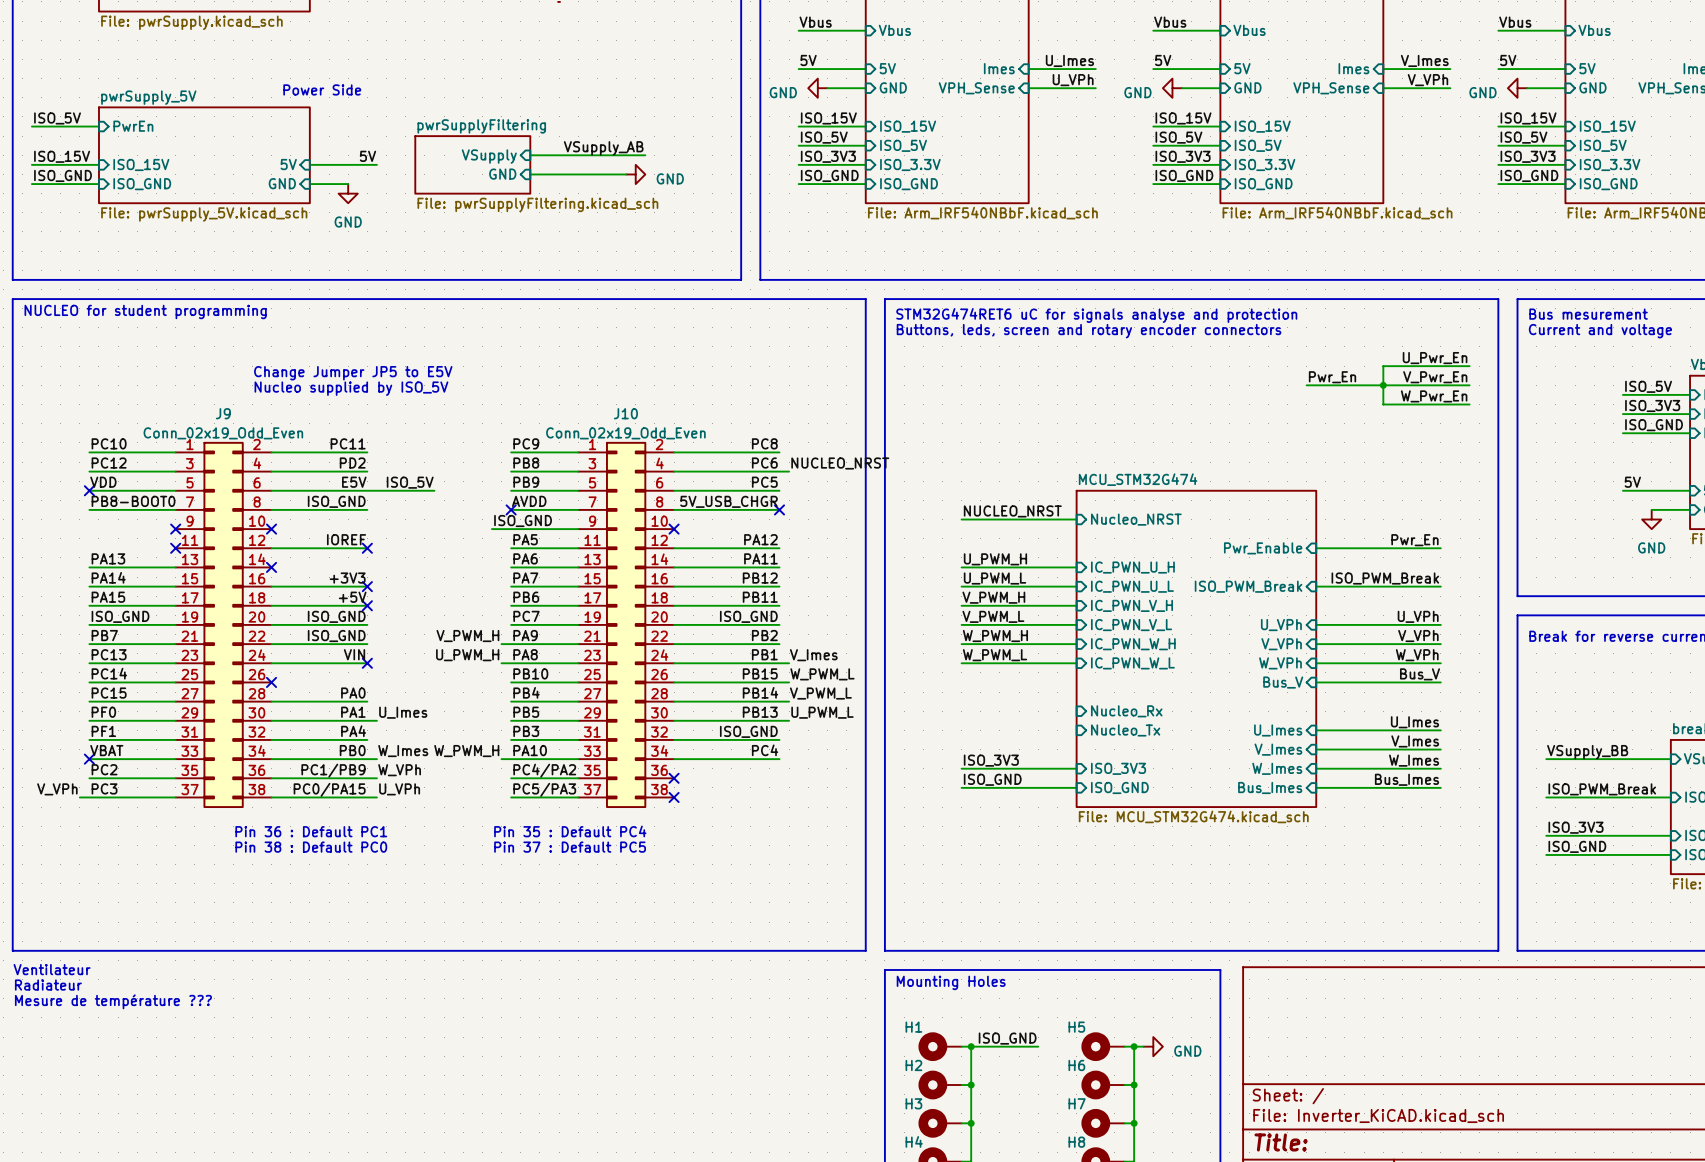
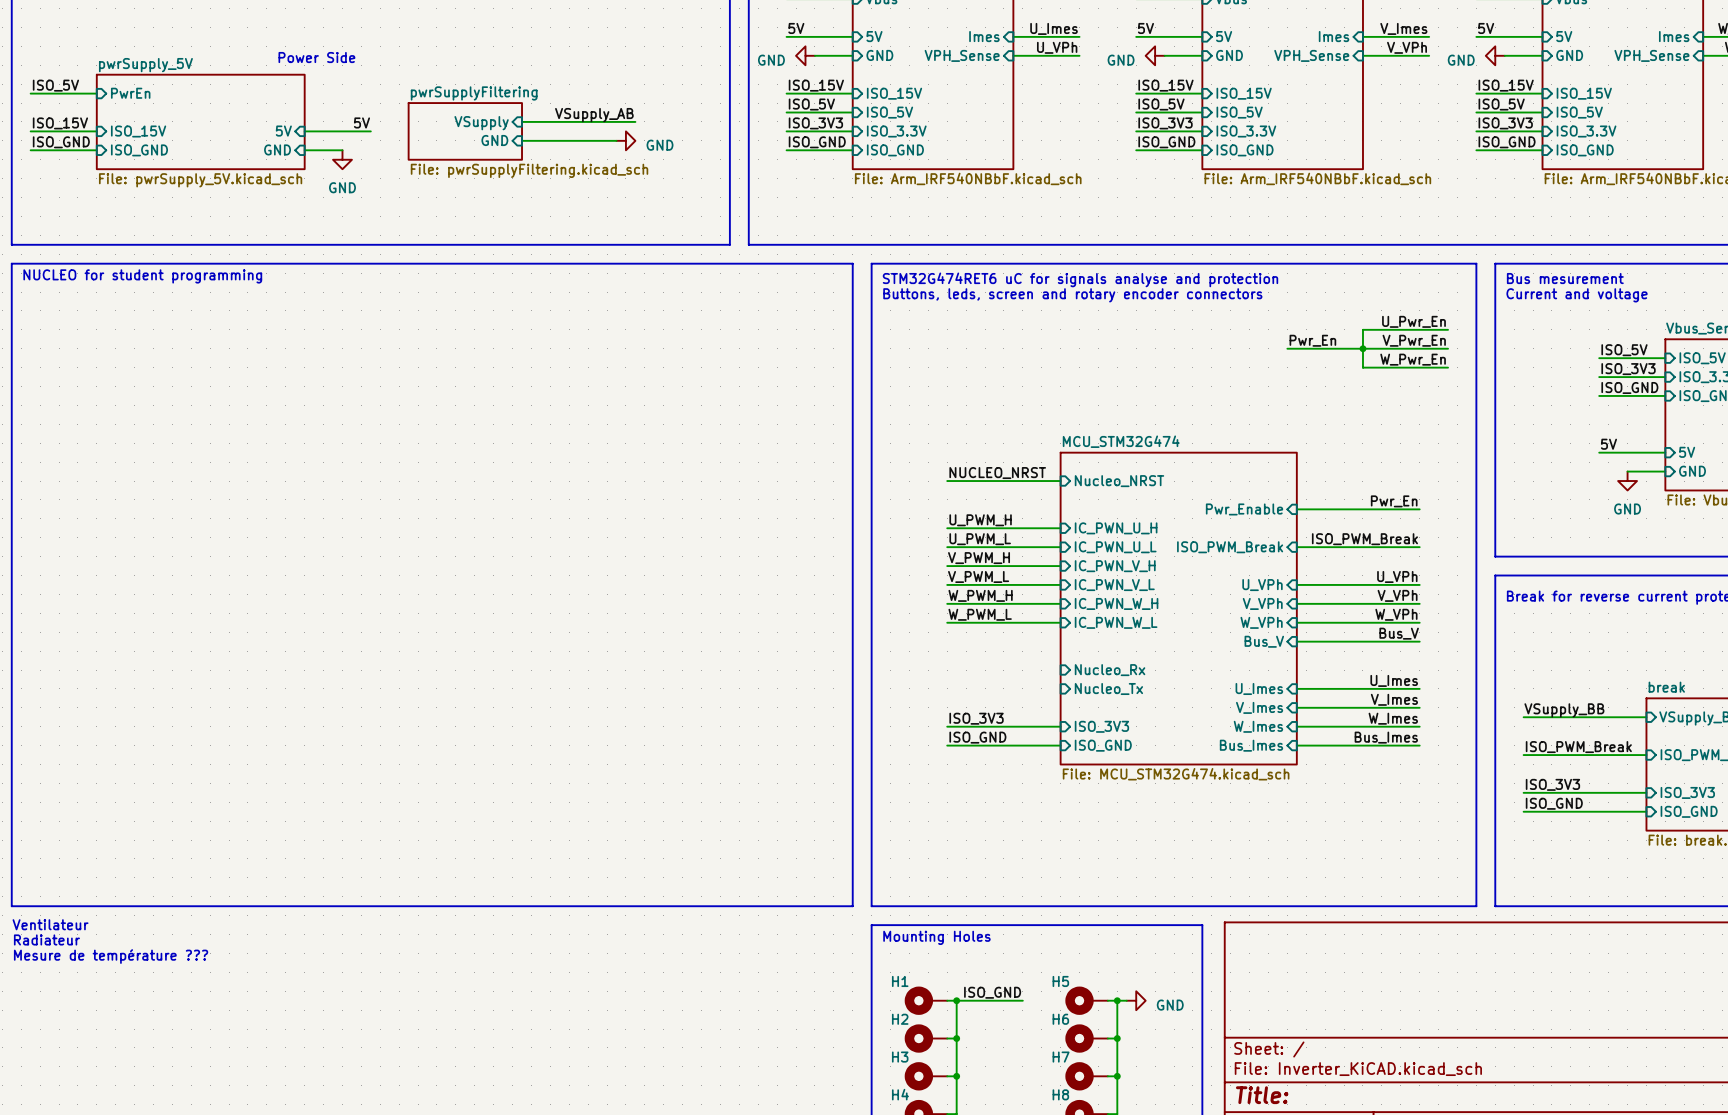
text: Change Jumper JP5 to E5V (353, 373) -> none
text: Nucleo supplied by ISO_5V (351, 388) -> none
label: PC10 (109, 443) -> none
label: PC11 (348, 443) -> none
label: PC9 (526, 443) -> none
label: PC8 (764, 443) -> none
wire: (89, 452) (175, 452) -> none
wire: (271, 452) (367, 452) -> none
wire: (511, 452) (578, 452) -> none
wire: (674, 452) (779, 452) -> none
label: PC12 (109, 463) -> none
label: PD2 (352, 463) -> none
label: PB8 (526, 463) -> none
label: PC6 (764, 463) -> none
label: NUCLEO_NRST (840, 463) -> none
wire: (89, 471) (175, 471) -> none
wire: (271, 471) (367, 471) -> none
wire: (511, 471) (578, 471) -> none
wire: (674, 471) (789, 471) -> none
label: VDD (103, 482) -> none
label: E5V (354, 482) -> none
label: ISO_5V (410, 482) -> none
label: PB9 (526, 482) -> none
label: PC5 (764, 482) -> none
wire: (89, 490) (175, 490) -> none
no-connect mark: (89, 490) -> none
wire: (271, 490) (434, 490) -> none
wire: (511, 490) (578, 490) -> none
wire: (674, 490) (779, 490) -> none
label: PB8-BOOT0 (133, 501) -> none
label: ISO_GND (336, 501) -> none
label: AVDD (529, 501) -> none
label: 5V_USB_CHGR (728, 501) -> none
wire: (89, 509) (175, 509) -> none
wire: (271, 509) (367, 509) -> none
wire: (511, 509) (578, 509) -> none
no-connect mark: (511, 509) -> none
wire: (674, 509) (779, 509) -> none
no-connect mark: (779, 509) -> none
label: ISO_GND (523, 521) -> none
no-connect mark: (175, 529) -> none
no-connect mark: (271, 529) -> none
wire: (491, 529) (578, 529) -> none
no-connect mark: (674, 529) -> none
label: IOREF (346, 539) -> none
label: PA5 (525, 539) -> none
label: PA12 (760, 539) -> none
no-connect mark: (175, 548) -> none
wire: (271, 548) (367, 548) -> none
no-connect mark: (367, 548) -> none
wire: (511, 548) (578, 548) -> none
wire: (674, 548) (779, 548) -> none
label: PA13 (108, 558) -> none
label: PA6 (525, 558) -> none
label: PA11 (760, 558) -> none
wire: (89, 567) (175, 567) -> none
no-connect mark: (271, 567) -> none
wire: (511, 567) (578, 567) -> none
wire: (674, 567) (779, 567) -> none
label: PA14 (108, 577) -> none
label: +3V3 (347, 578) -> none
label: PA7 (525, 578) -> none
label: PB12 (760, 578) -> none
wire: (89, 586) (175, 586) -> none
wire: (271, 586) (367, 586) -> none
no-connect mark: (367, 586) -> none
wire: (511, 586) (578, 586) -> none
wire: (674, 586) (779, 586) -> none
label: PA15 (108, 597) -> none
label: +5V (352, 597) -> none
label: PB6 (526, 597) -> none
label: PB11 (760, 597) -> none
wire: (89, 605) (175, 605) -> none
wire: (271, 605) (367, 605) -> none
no-connect mark: (367, 605) -> none
wire: (511, 605) (578, 605) -> none
wire: (674, 605) (779, 605) -> none
label: ISO_GND (120, 616) -> none
label: ISO_GND (336, 616) -> none
label: PC7 (526, 616) -> none
label: ISO_GND (748, 616) -> none
wire: (89, 624) (175, 624) -> none
J9: Conn_02x19_Odd_Even (223, 624) -> none
wire: (271, 624) (367, 624) -> none
wire: (511, 624) (578, 624) -> none
J10: Conn_02x19_Odd_Even (626, 624) -> none
wire: (674, 624) (779, 624) -> none
label: PB7 (104, 635) -> none
label: PA9 (525, 635) -> none
label: PB2 (764, 635) -> none
label: ISO_GND (336, 636) -> none
label: V_PWM_H (467, 636) -> none
wire: (89, 644) (175, 644) -> none
wire: (271, 644) (367, 644) -> none
wire: (501, 644) (578, 644) -> none
wire: (674, 644) (779, 644) -> none
label: PC13 (109, 654) -> none
label: VIN (354, 654) -> none
label: PA8 (525, 654) -> none
label: PB1 (764, 654) -> none
label: U_PWM_H (467, 655) -> none
label: V_Imes (813, 655) -> none
wire: (89, 663) (175, 663) -> none
wire: (271, 663) (367, 663) -> none
no-connect mark: (367, 663) -> none
wire: (501, 663) (578, 663) -> none
wire: (674, 663) (789, 663) -> none
label: PC14 (109, 673) -> none
label: PB10 (530, 673) -> none
label: PB15 (760, 673) -> none
label: W_PWM_L (822, 674) -> none
wire: (89, 682) (175, 682) -> none
no-connect mark: (271, 682) -> none
wire: (511, 682) (578, 682) -> none
wire: (674, 682) (789, 682) -> none
label: PB4 (526, 692) -> none
label: PB14 (760, 692) -> none
label: PC15 (109, 693) -> none
label: PA0 (353, 693) -> none
label: V_PWM_L (820, 693) -> none
wire: (89, 701) (175, 701) -> none
wire: (271, 701) (367, 701) -> none
wire: (511, 701) (578, 701) -> none
wire: (674, 701) (789, 701) -> none
label: PF0 (103, 712) -> none
label: PA1 (353, 712) -> none
label: U_Imes (403, 712) -> none
label: PB5 (526, 712) -> none
label: PB13 (760, 712) -> none
label: U_PWM_L (822, 712) -> none
wire: (89, 720) (175, 720) -> none
wire: (271, 720) (376, 720) -> none
wire: (511, 720) (578, 720) -> none
wire: (674, 720) (789, 720) -> none
label: PF1 (103, 731) -> none
label: PA4 (353, 731) -> none
label: PB3 (526, 731) -> none
label: ISO_GND (748, 731) -> none
wire: (89, 739) (175, 739) -> none
wire: (271, 739) (367, 739) -> none
wire: (511, 739) (578, 739) -> none
wire: (674, 739) (779, 739) -> none
label: VBAT (106, 750) -> none
label: PB0 (352, 750) -> none
label: PA10 (530, 750) -> none
label: PC4 (765, 750) -> none
label: W_Imes (403, 751) -> none
label: W_PWM_H (466, 751) -> none
wire: (89, 759) (175, 759) -> none
no-connect mark: (89, 759) -> none
wire: (271, 759) (376, 759) -> none
wire: (501, 759) (578, 759) -> none
wire: (674, 759) (779, 759) -> none
label: PC2 (104, 769) -> none
label: PC1/PB9 (333, 770) -> none
label: W_VPh (399, 770) -> none
label: PC4/PA2 (544, 770) -> none
wire: (89, 778) (175, 778) -> none
wire: (271, 778) (376, 778) -> none
wire: (511, 778) (578, 778) -> none
no-connect mark: (674, 778) -> none
label: PC3 (104, 788) -> none
label: V_VPh (57, 789) -> none
label: PC0/PA15 (329, 789) -> none
label: U_VPh (399, 789) -> none
label: PC5/PA3 (544, 789) -> none
wire: (79, 797) (175, 797) -> none
wire: (271, 797) (376, 797) -> none
wire: (511, 797) (578, 797) -> none
no-connect mark: (674, 797) -> none
text: Pin 36 : Default PC1 (311, 831) -> none
text: Pin 35 : Default PC4 (570, 831) -> none
text: Pin 38 : Default PC0 (311, 847) -> none
text: Pin 37 : Default PC5 (570, 847) -> none

